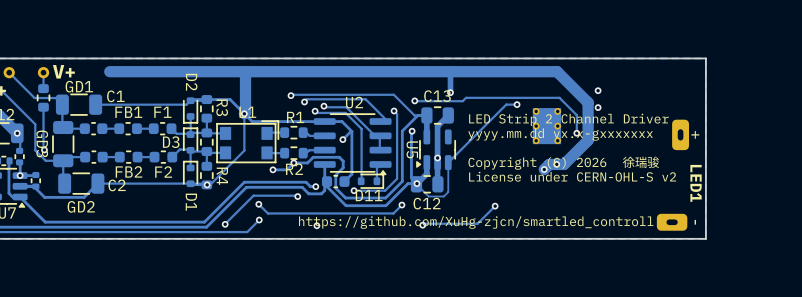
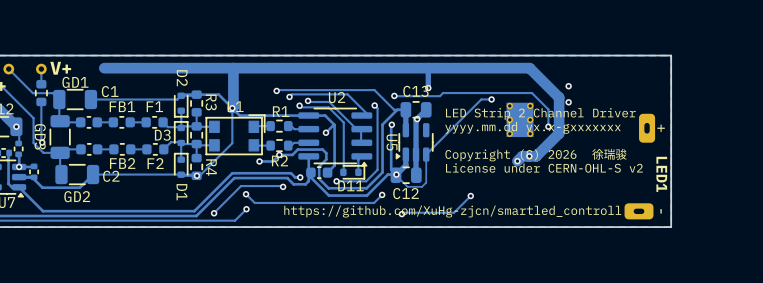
via position: (437, 158) -> (417, 119)
via: (316, 225) -> none

